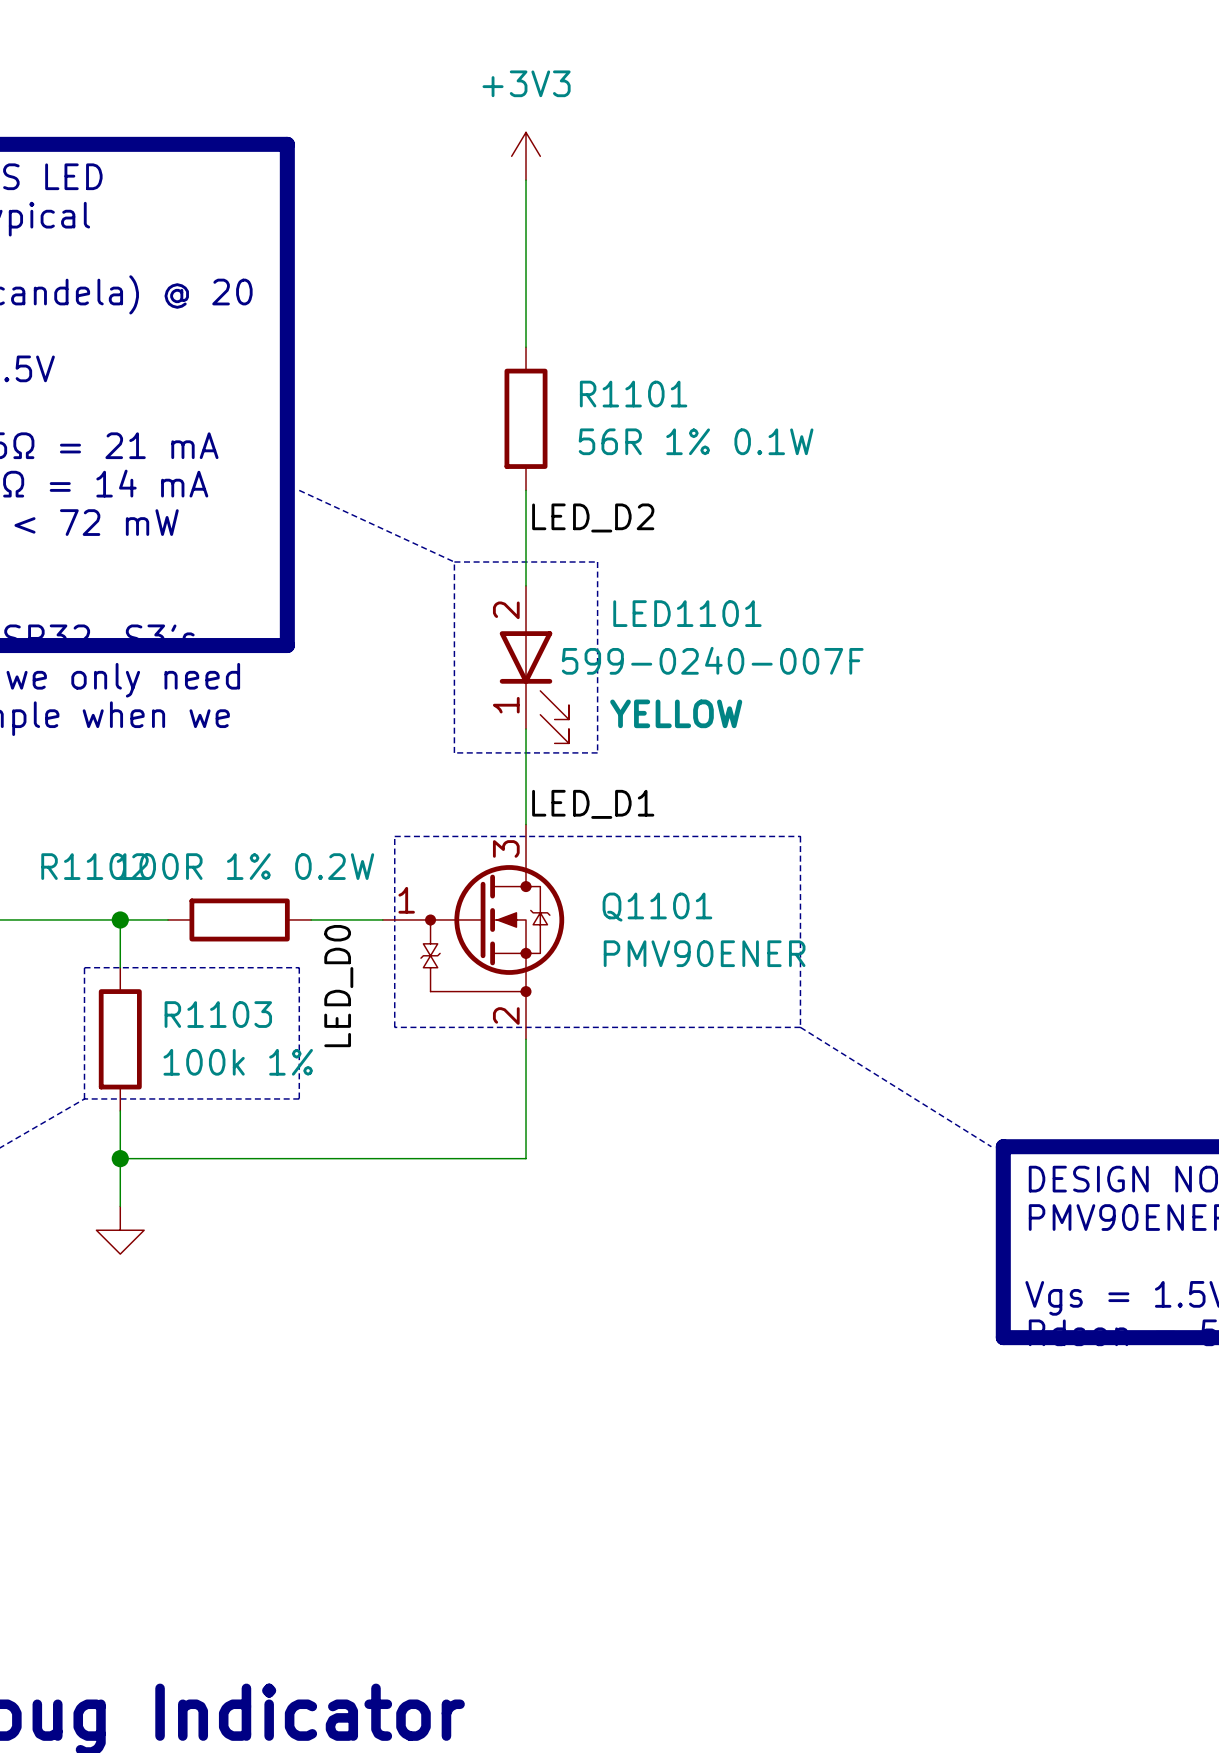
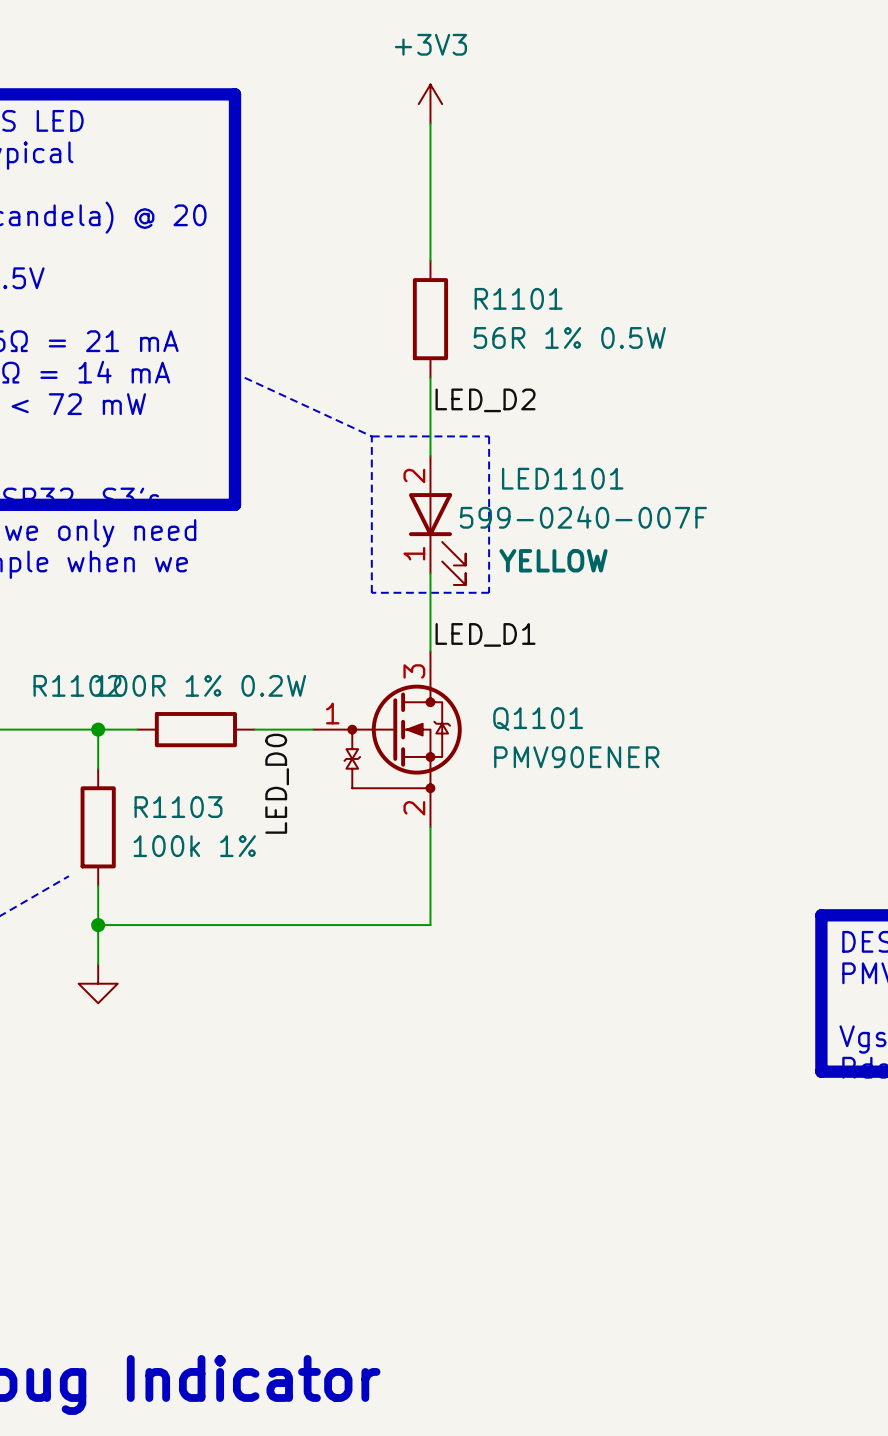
R1101 value: 56R 1% 0.1W (696, 441) -> 56R 1% 0.5W (569, 337)
line: (84, 967) (299, 967) (299, 1098) (84, 1098) (84, 967) -> none
line: (800, 1027) (991, 1146) -> none
line: (800, 1027) (800, 836) (394, 836) (394, 1027) (800, 1027) -> none

